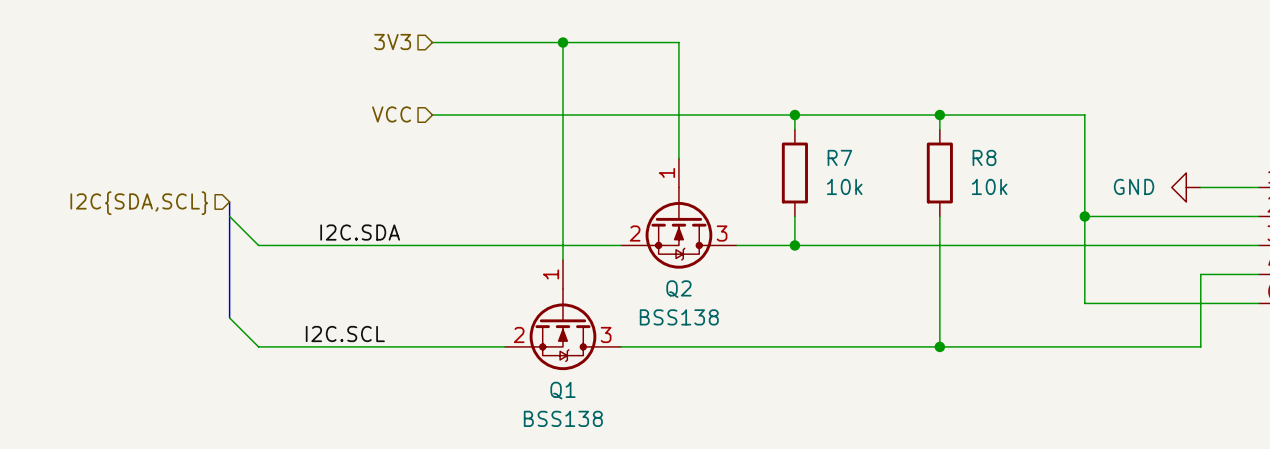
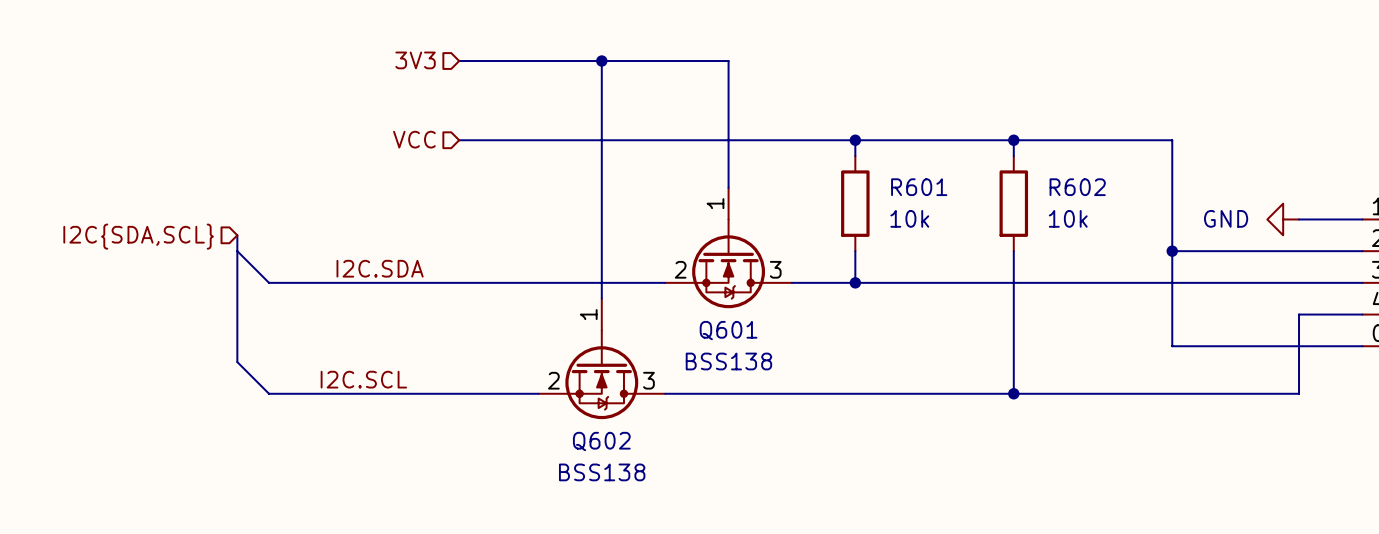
R7 name: R7 (839, 157) -> R601 (919, 187)
R8 name: R8 (984, 157) -> R602 (1077, 187)
Q2 name: Q2 (678, 289) -> Q601 (728, 330)
Q1 name: Q1 (562, 390) -> Q602 (601, 441)

